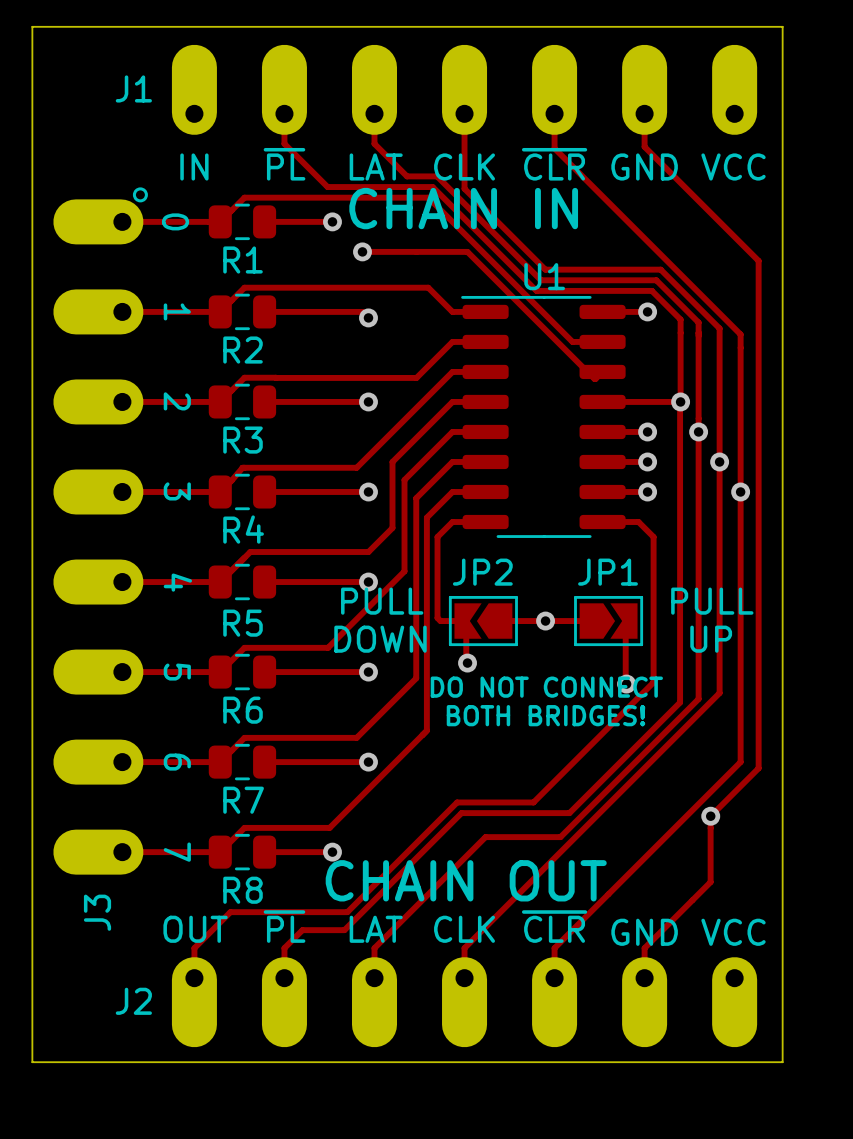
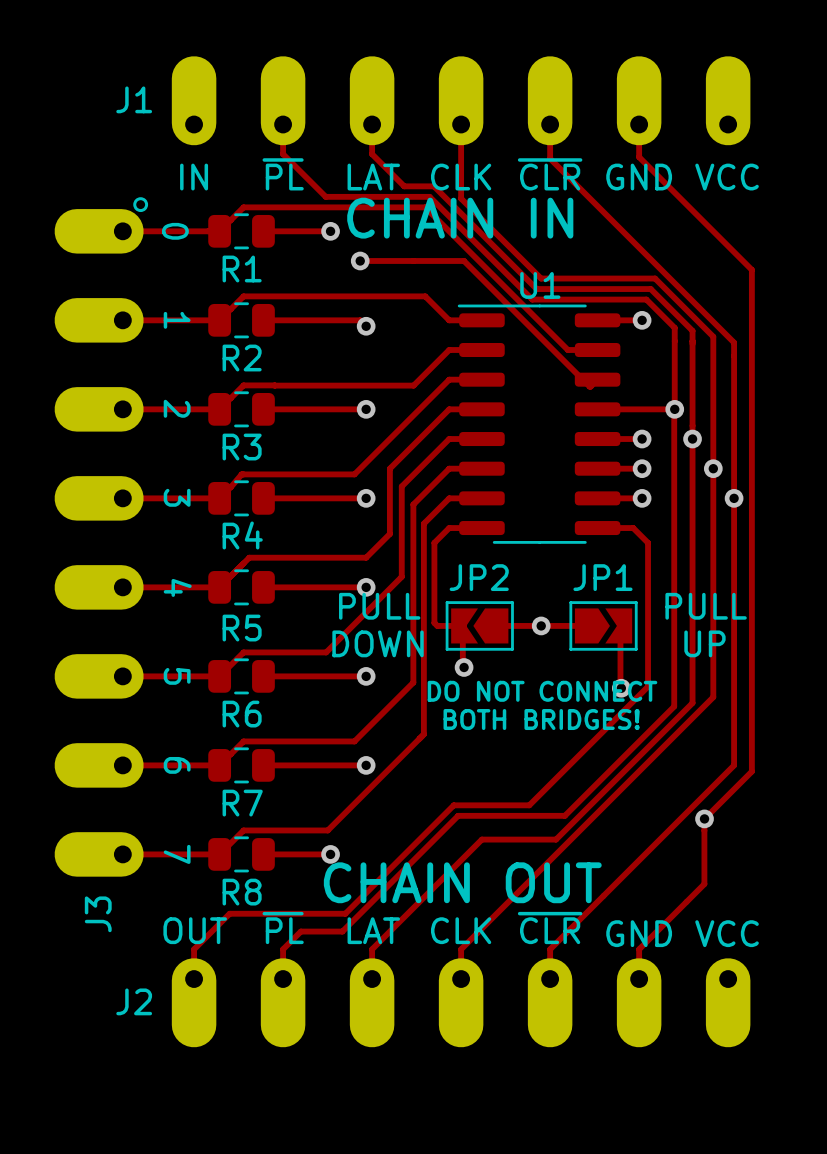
board edge: (32, 26) (32, 1062) (782, 1062) (782, 26) (32, 26) -> none

